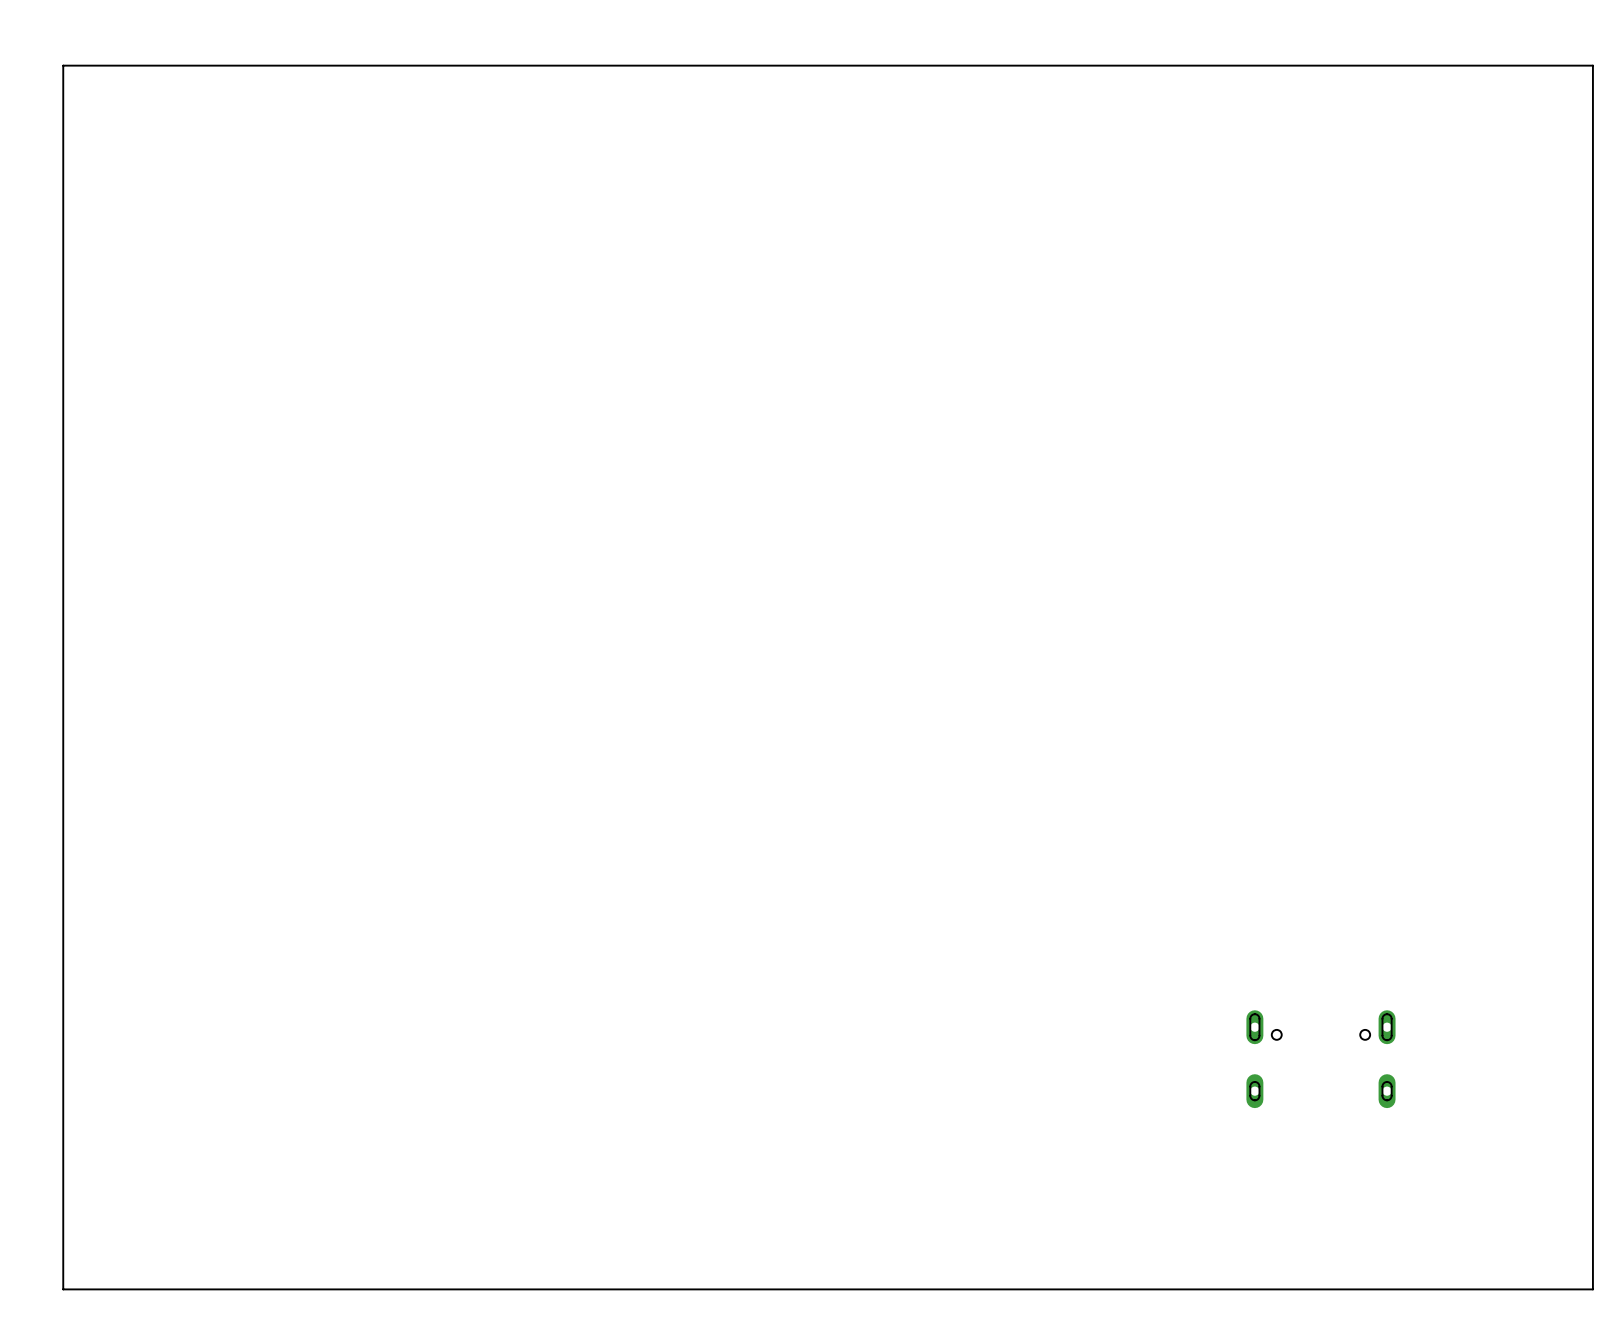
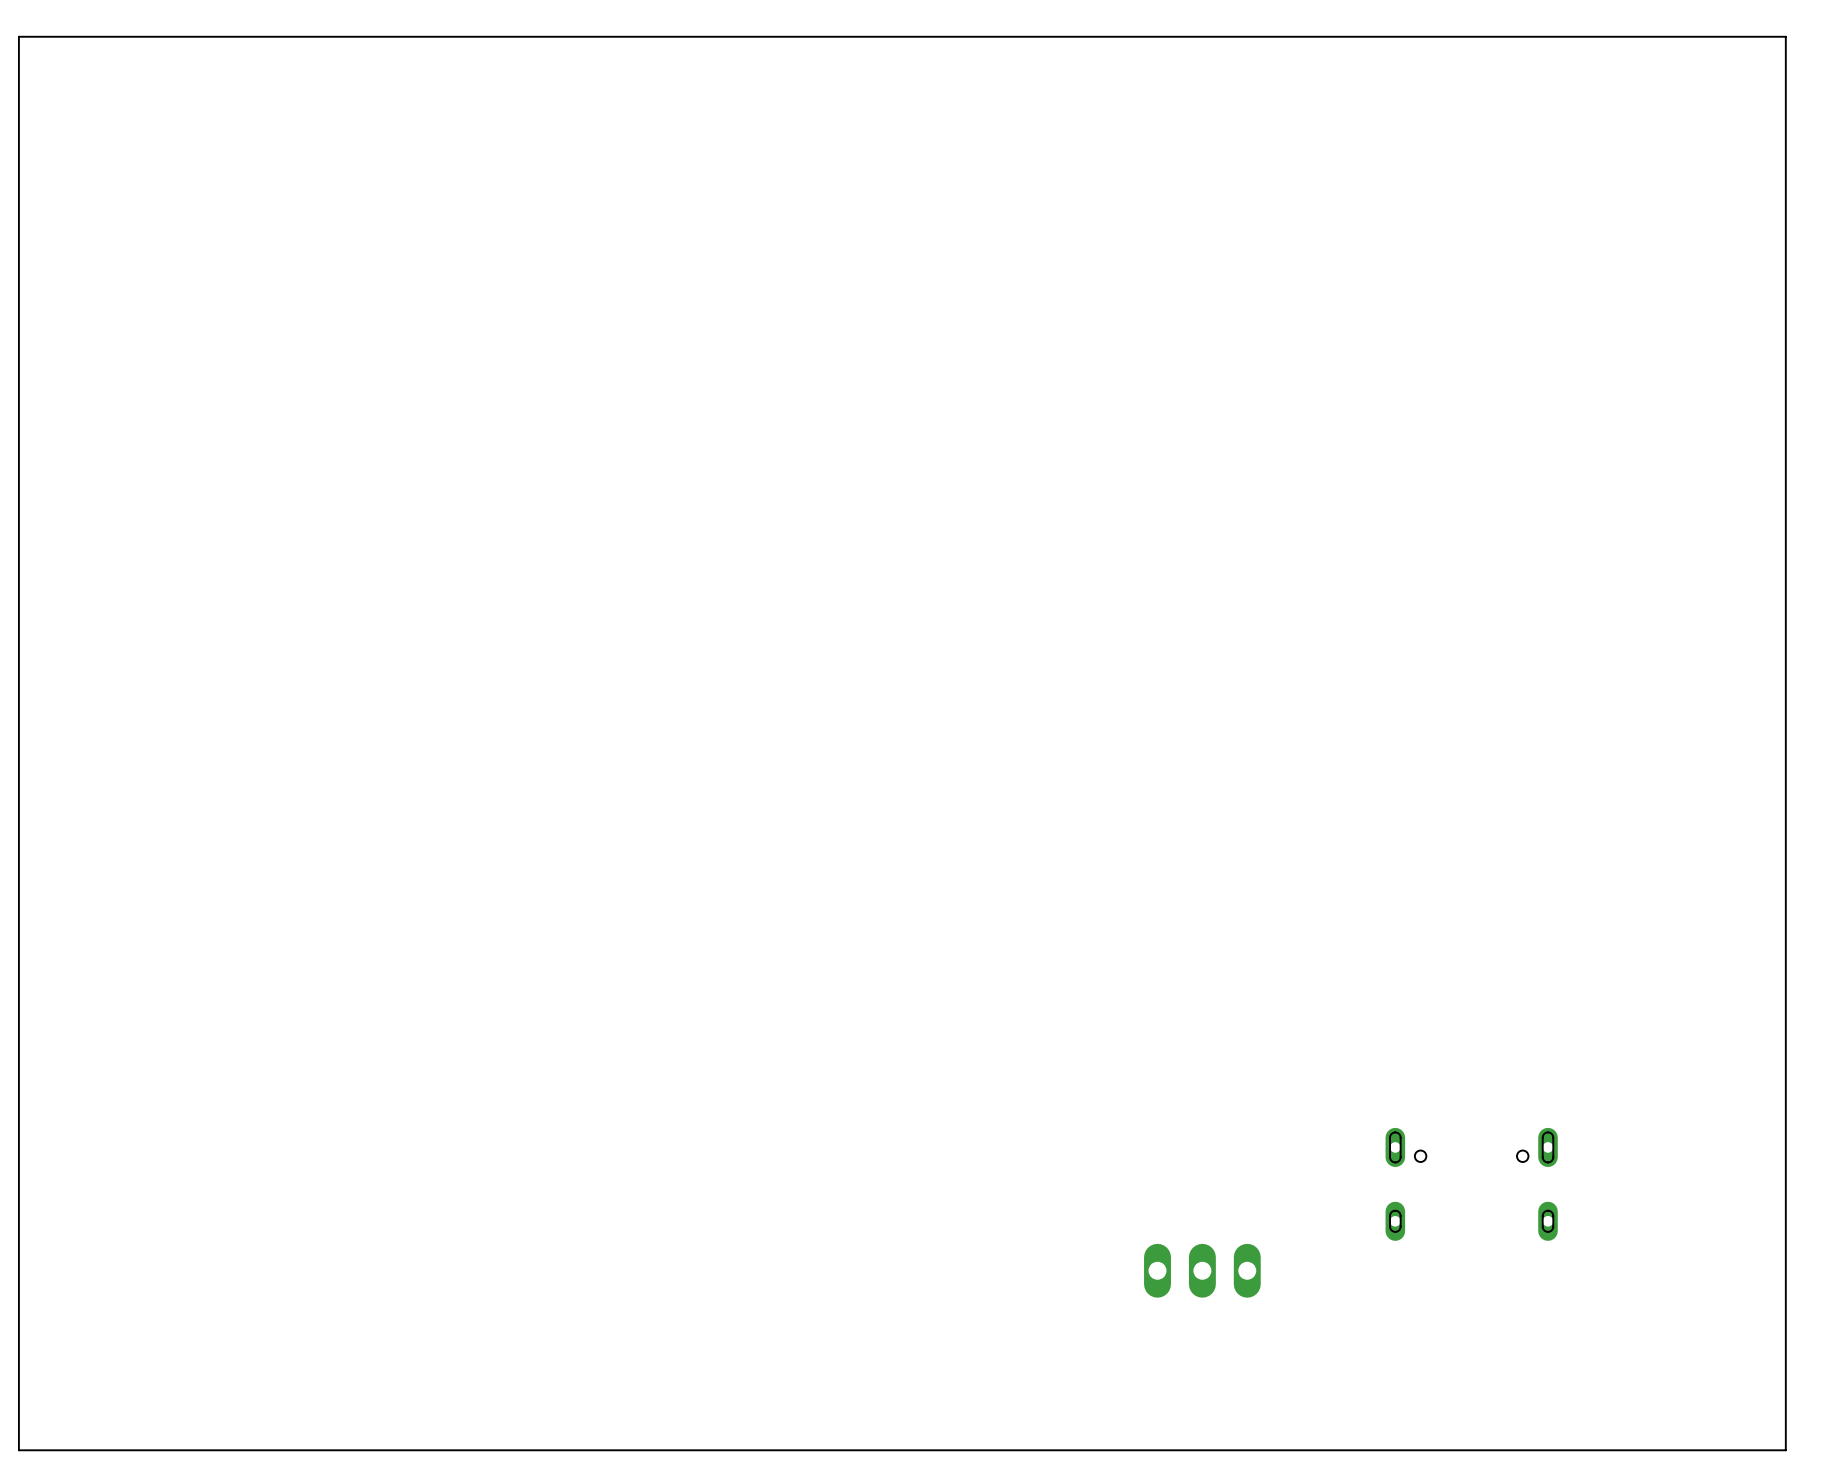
part: none -> (1202, 1270)

